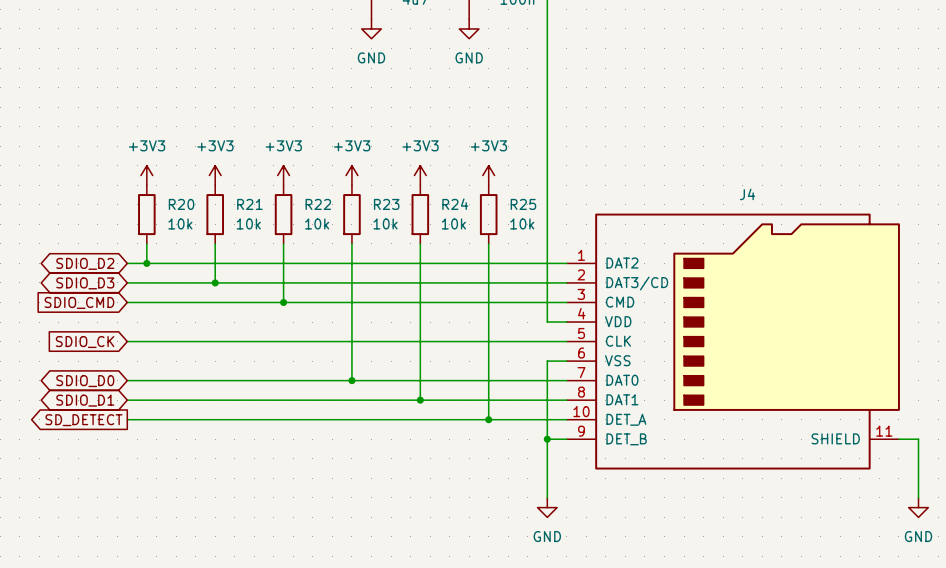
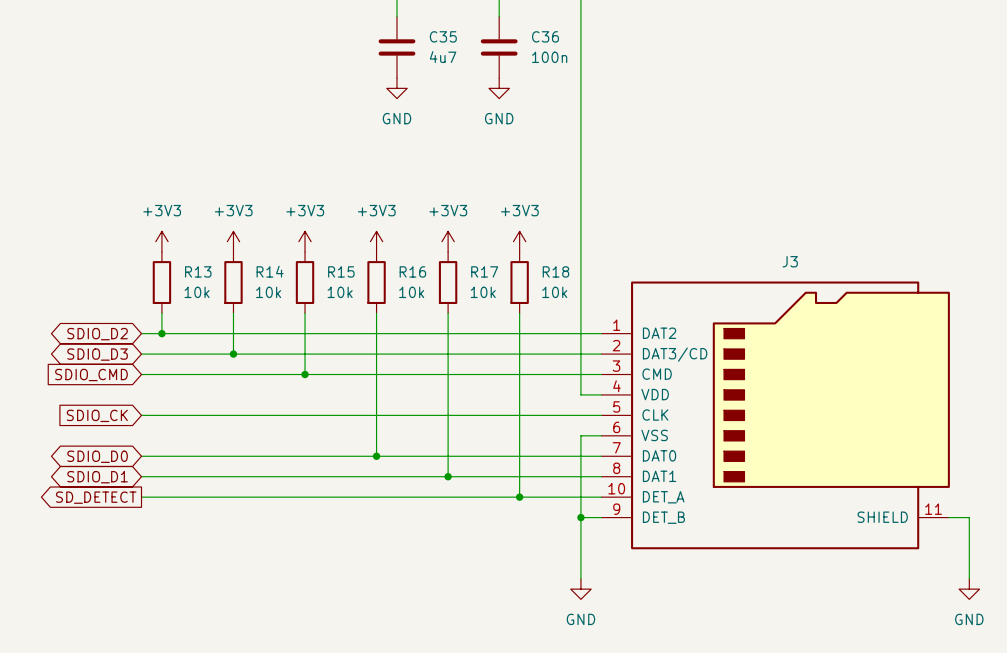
J4 name: J4 (747, 194) -> J3 (790, 261)
R20 name: R20 (181, 204) -> R13 (198, 271)
R21 name: R21 (249, 204) -> R14 (270, 271)
R22 name: R22 (318, 204) -> R15 (341, 271)
R23 name: R23 (386, 204) -> R16 (412, 271)
R24 name: R24 (455, 204) -> R17 (484, 271)
R25 name: R25 (523, 204) -> R18 (555, 271)

